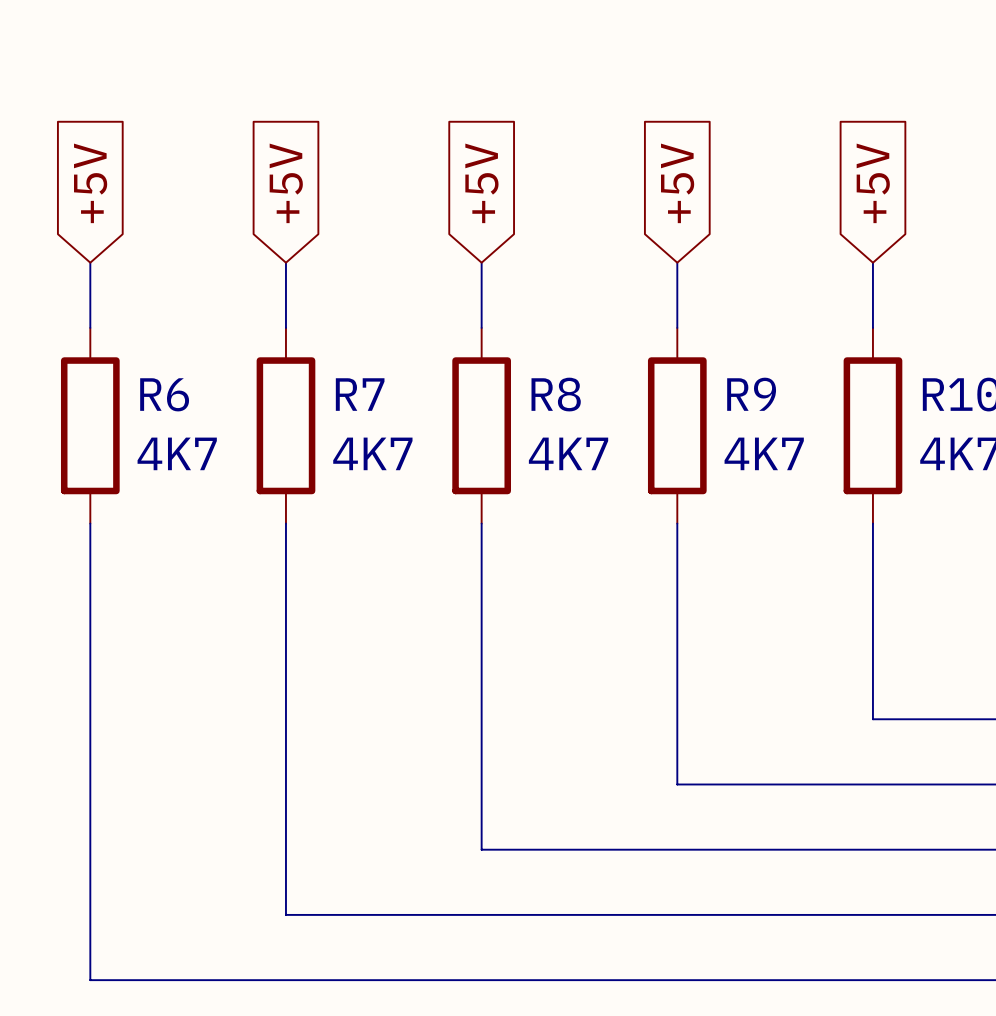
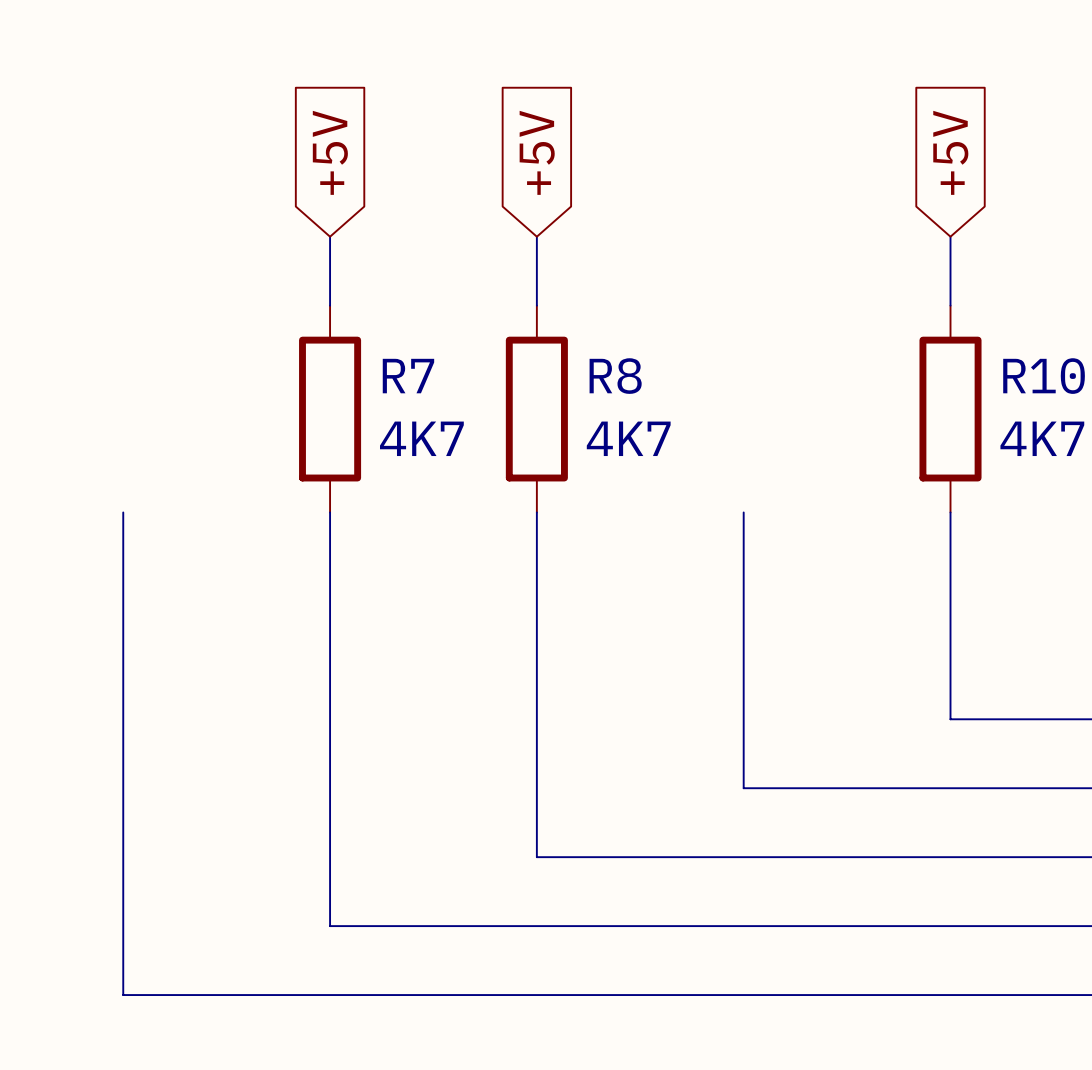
global label: +5V (90, 183) -> none
global label: +5V (677, 183) -> none
wire: (90, 262) (90, 327) -> none
wire: (677, 262) (677, 327) -> none
R6: 4K7 (90, 425) -> none
R9: 4K7 (677, 425) -> none

